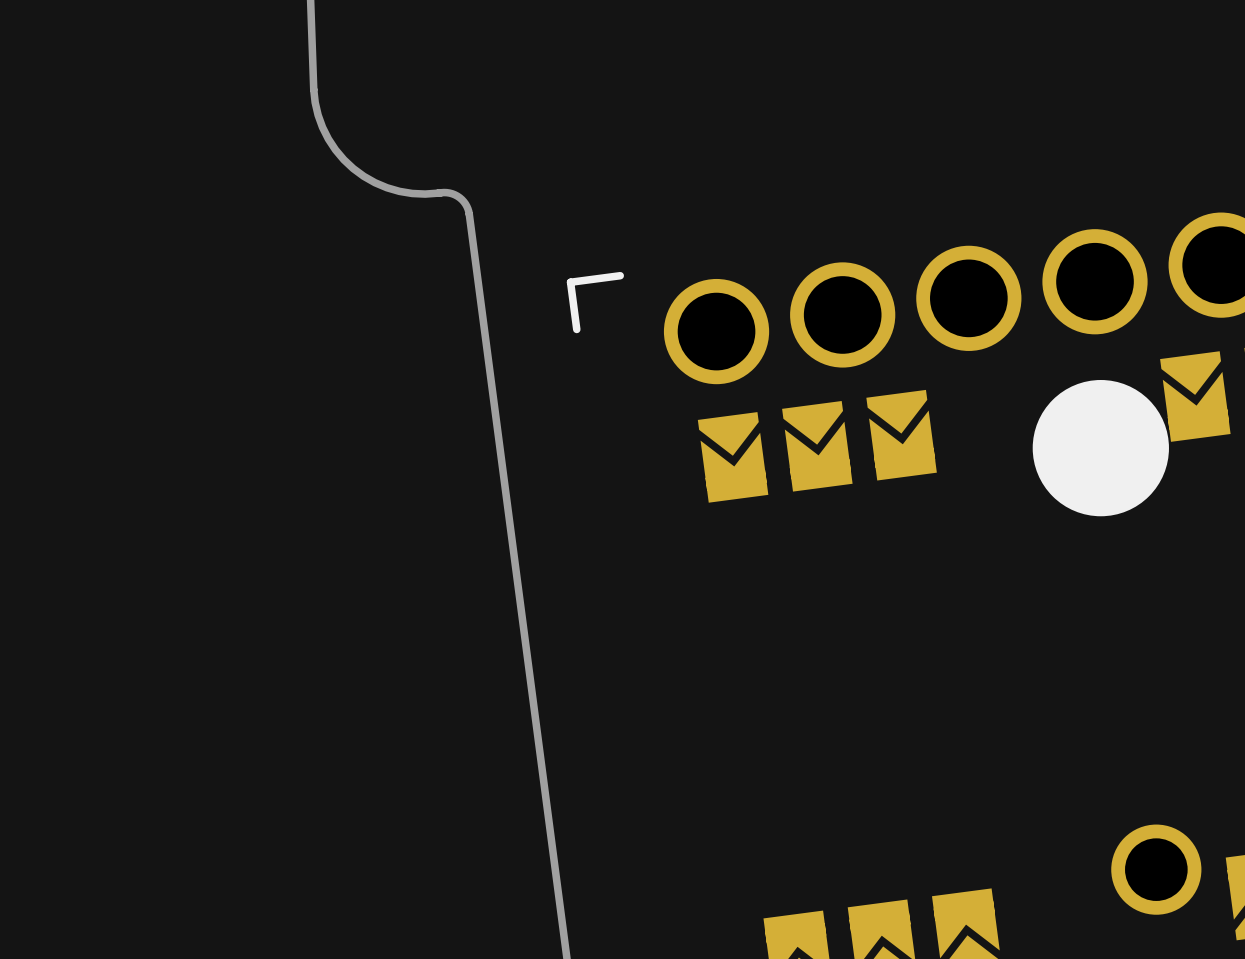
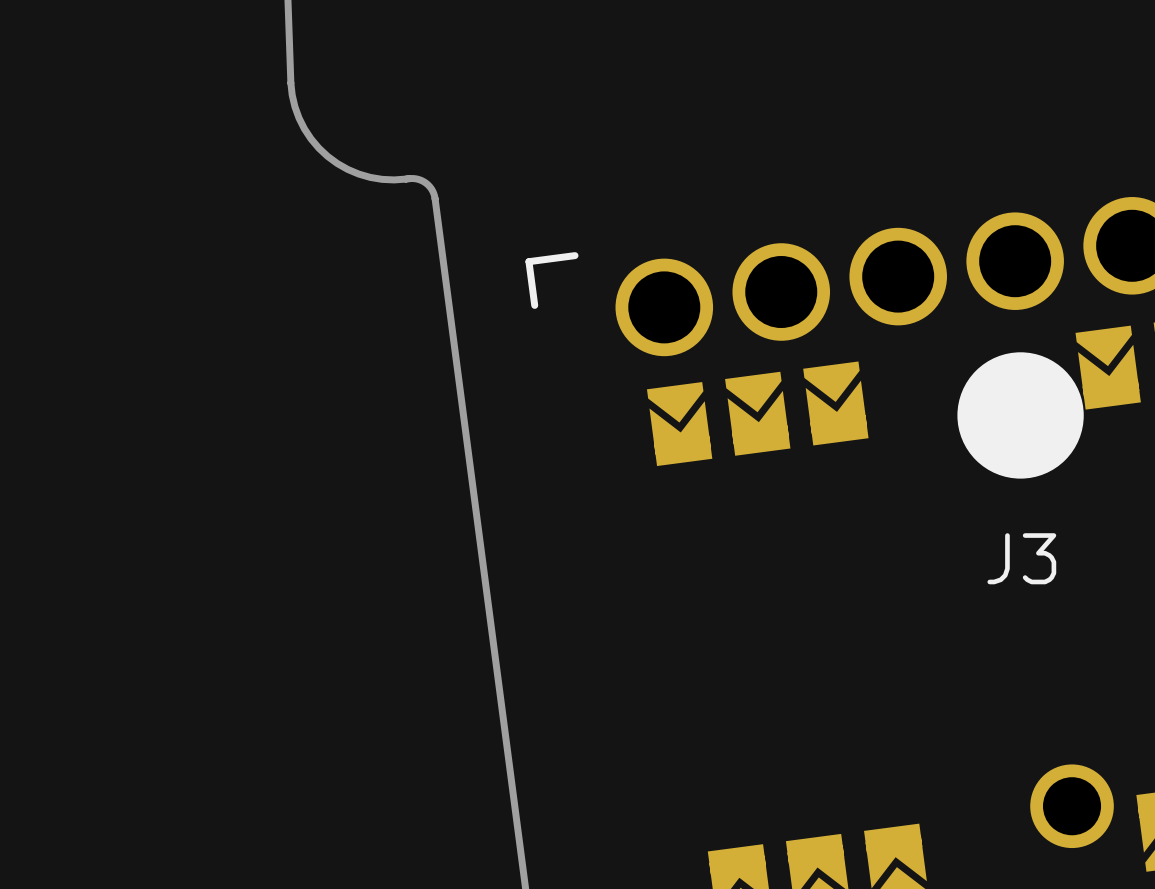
J3 name: none -> J3 (1021, 558)

